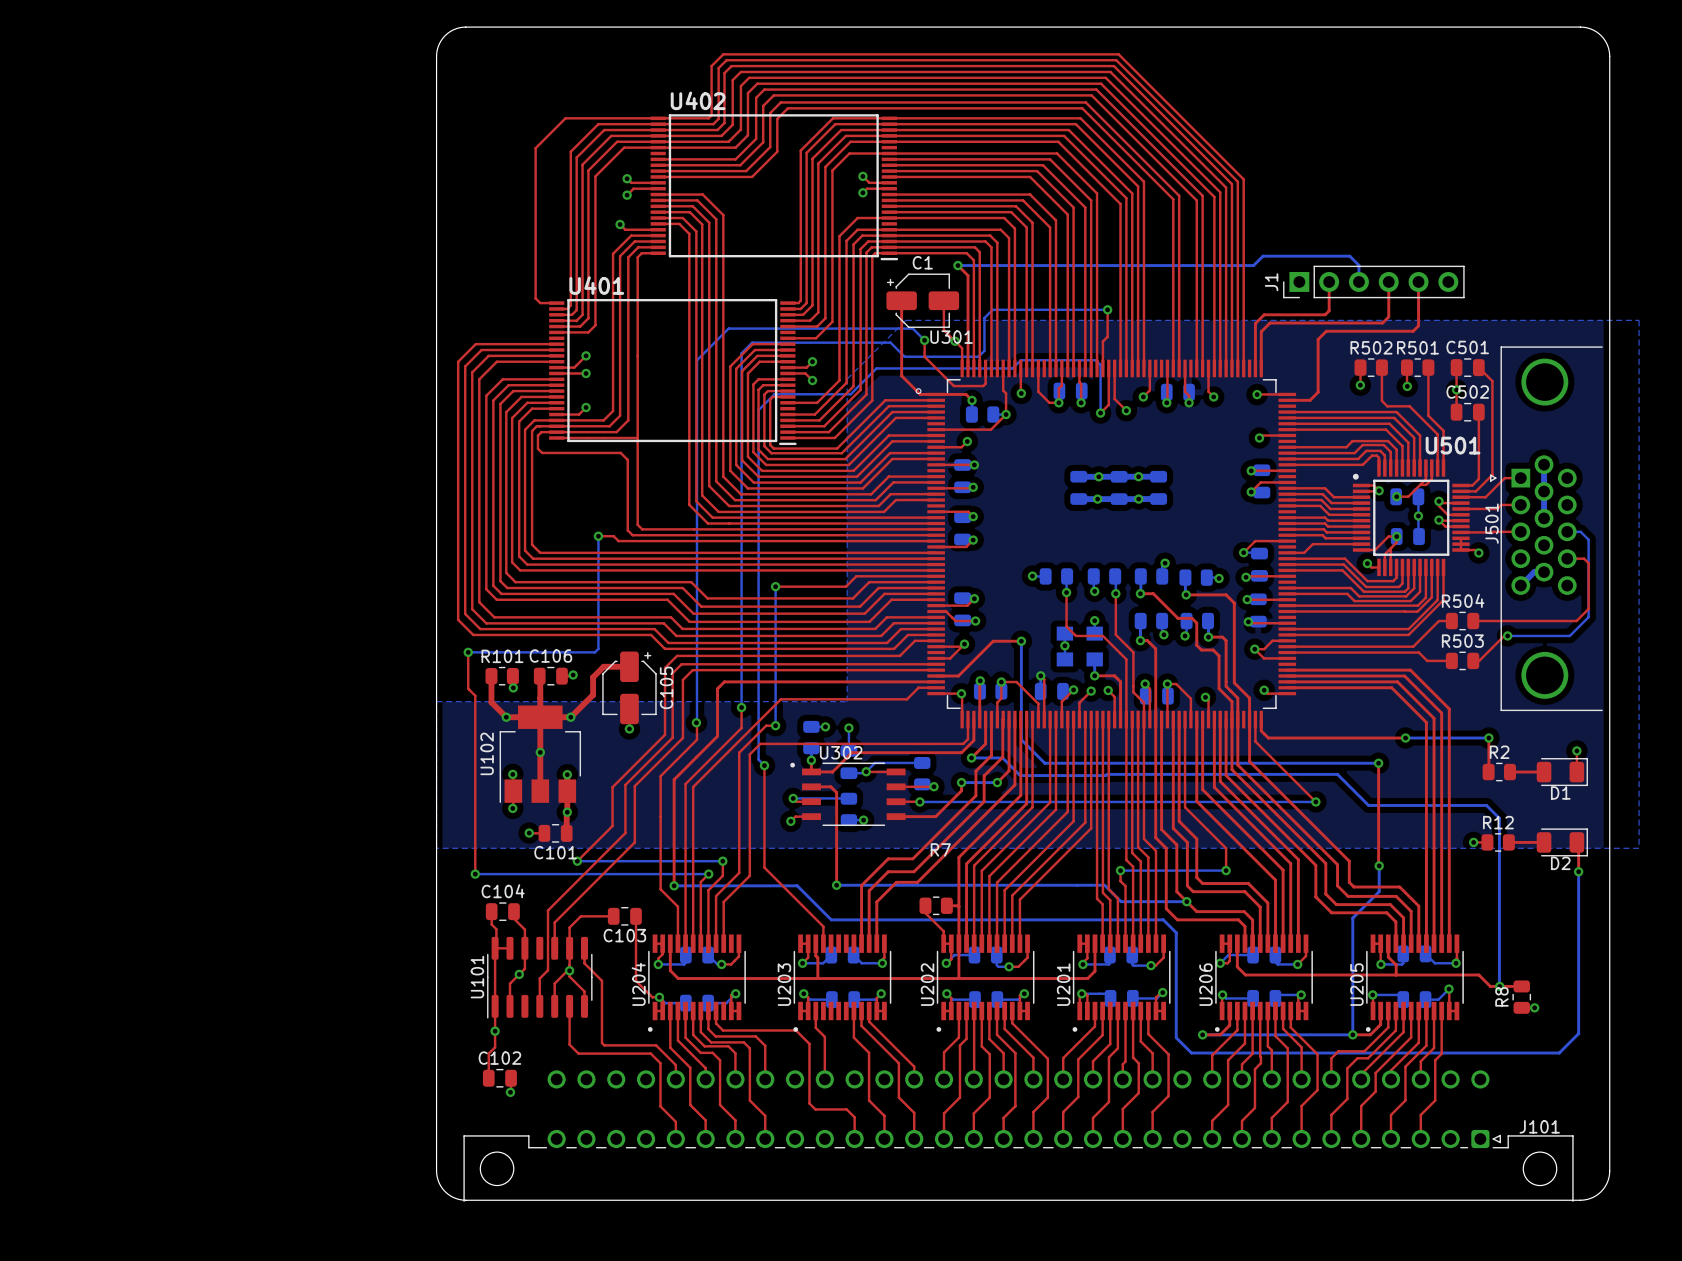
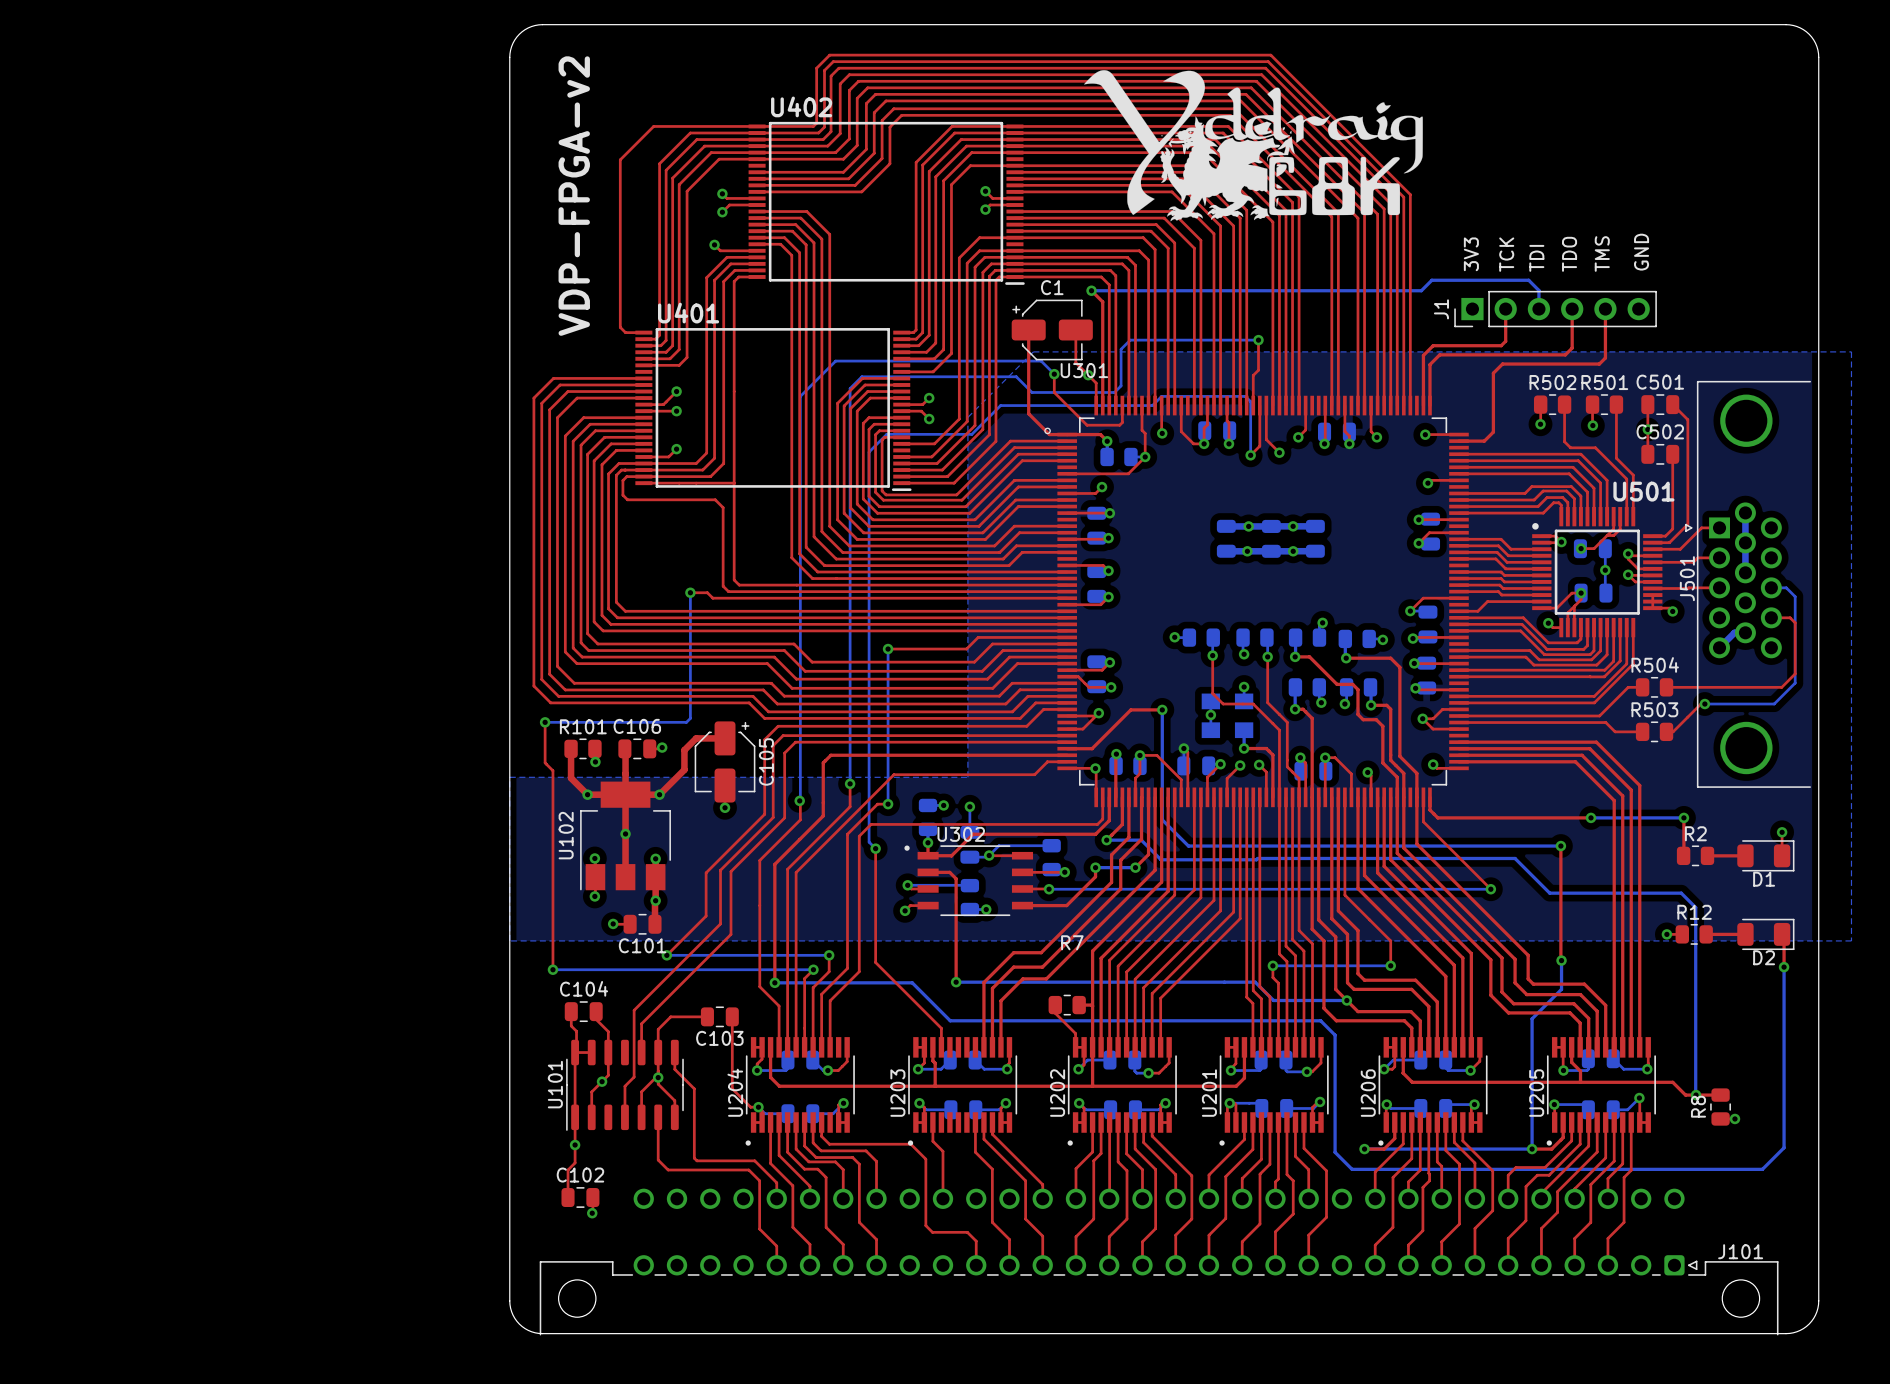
drawing: none -> [1084, 70, 1423, 222]
text: none -> VDP-FPGA-v2 (574, 196)
text: none -> GND (1641, 252)
text: none -> 3V3 (1471, 254)
text: none -> TDO (1569, 254)
text: none -> TMS (1602, 253)
text: none -> TCK (1506, 254)
text: none -> TDI (1536, 258)

